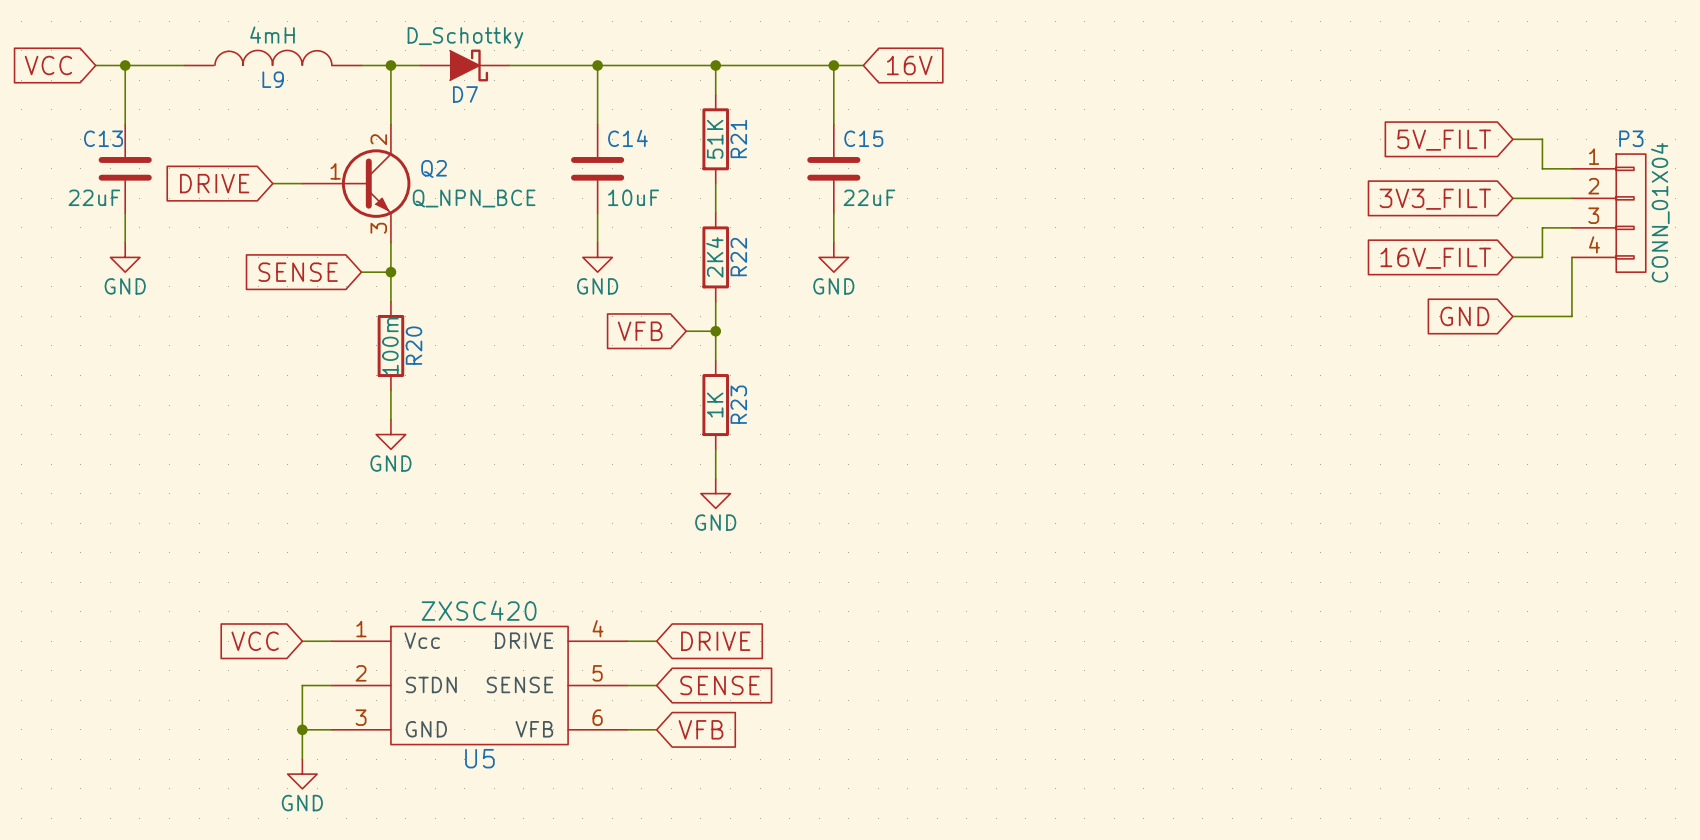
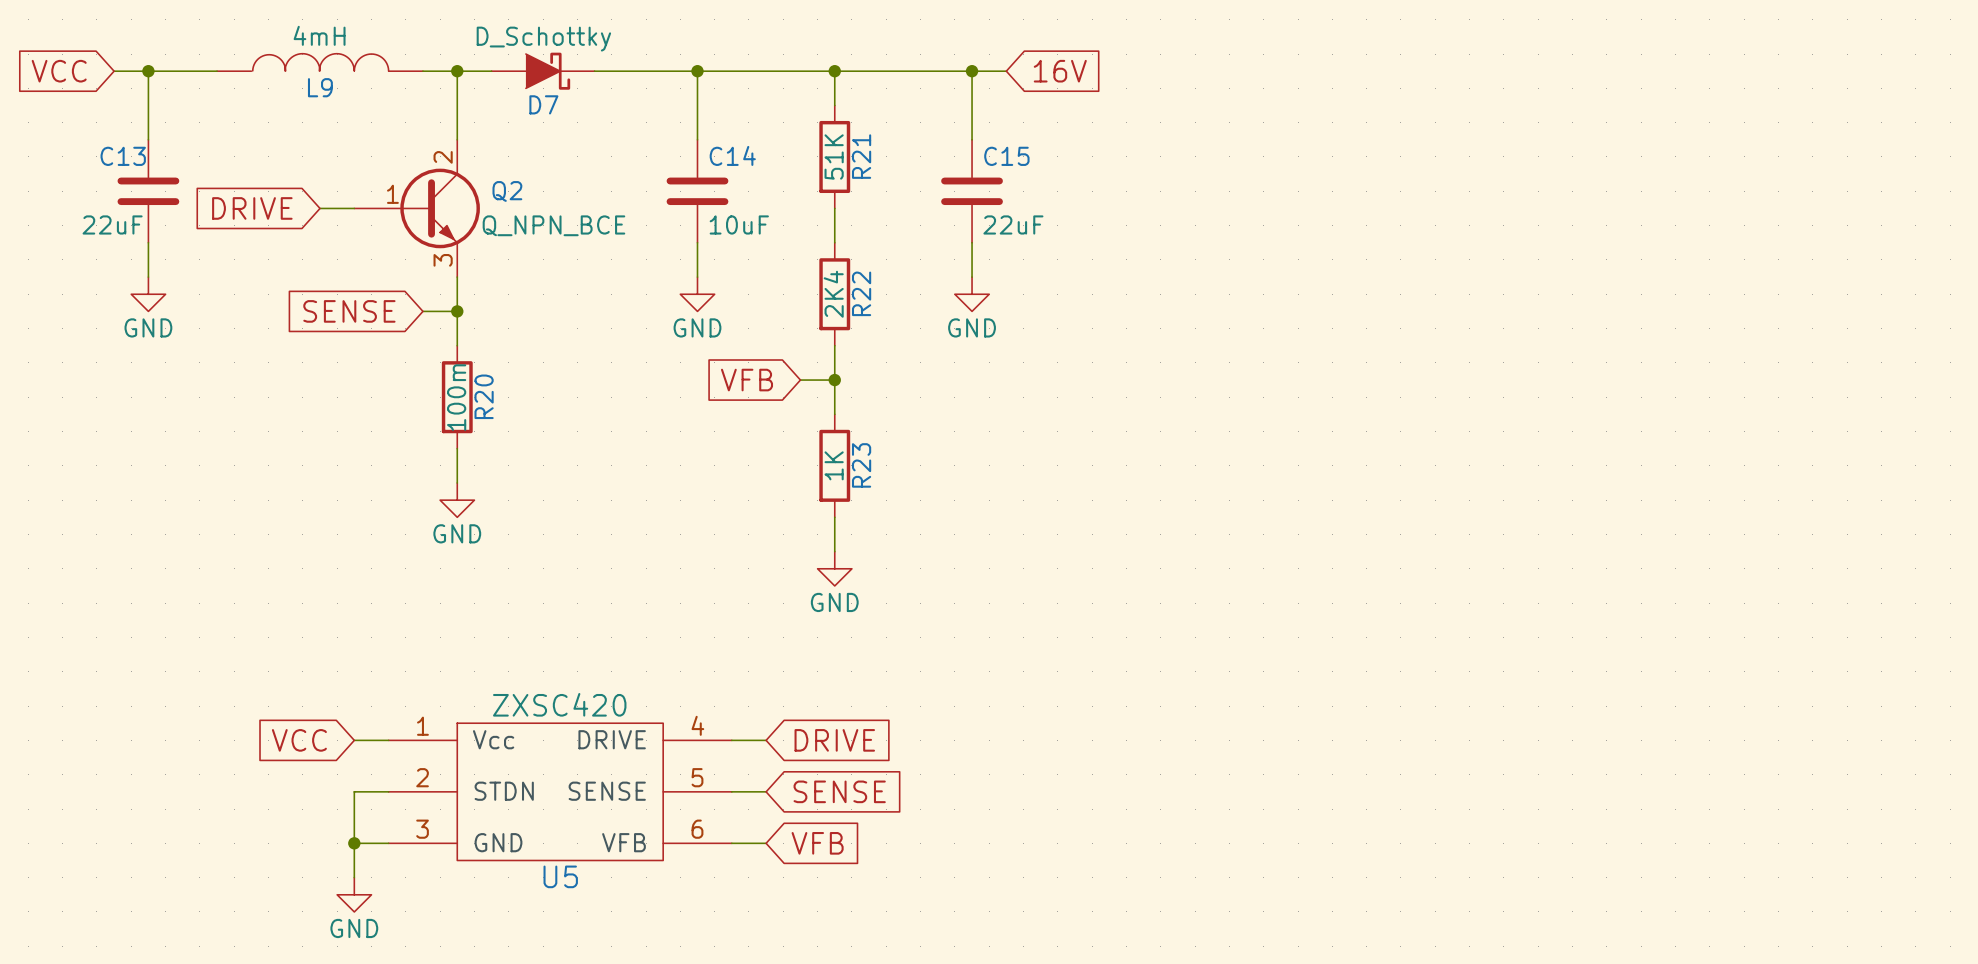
wire: (1512, 139) (1542, 139) (1542, 168) (1571, 168) -> none
global label: 5V_FILT (1444, 140) -> none
wire: (1512, 198) (1571, 198) -> none
global label: 3V3_FILT (1435, 199) -> none
P3: CONN_01X04 (1608, 213) -> none
wire: (1571, 227) (1542, 227) (1542, 257) (1512, 257) -> none
wire: (1571, 257) (1571, 316) (1512, 316) -> none
global label: 16V_FILT (1435, 258) -> none
global label: GND (1464, 316) -> none

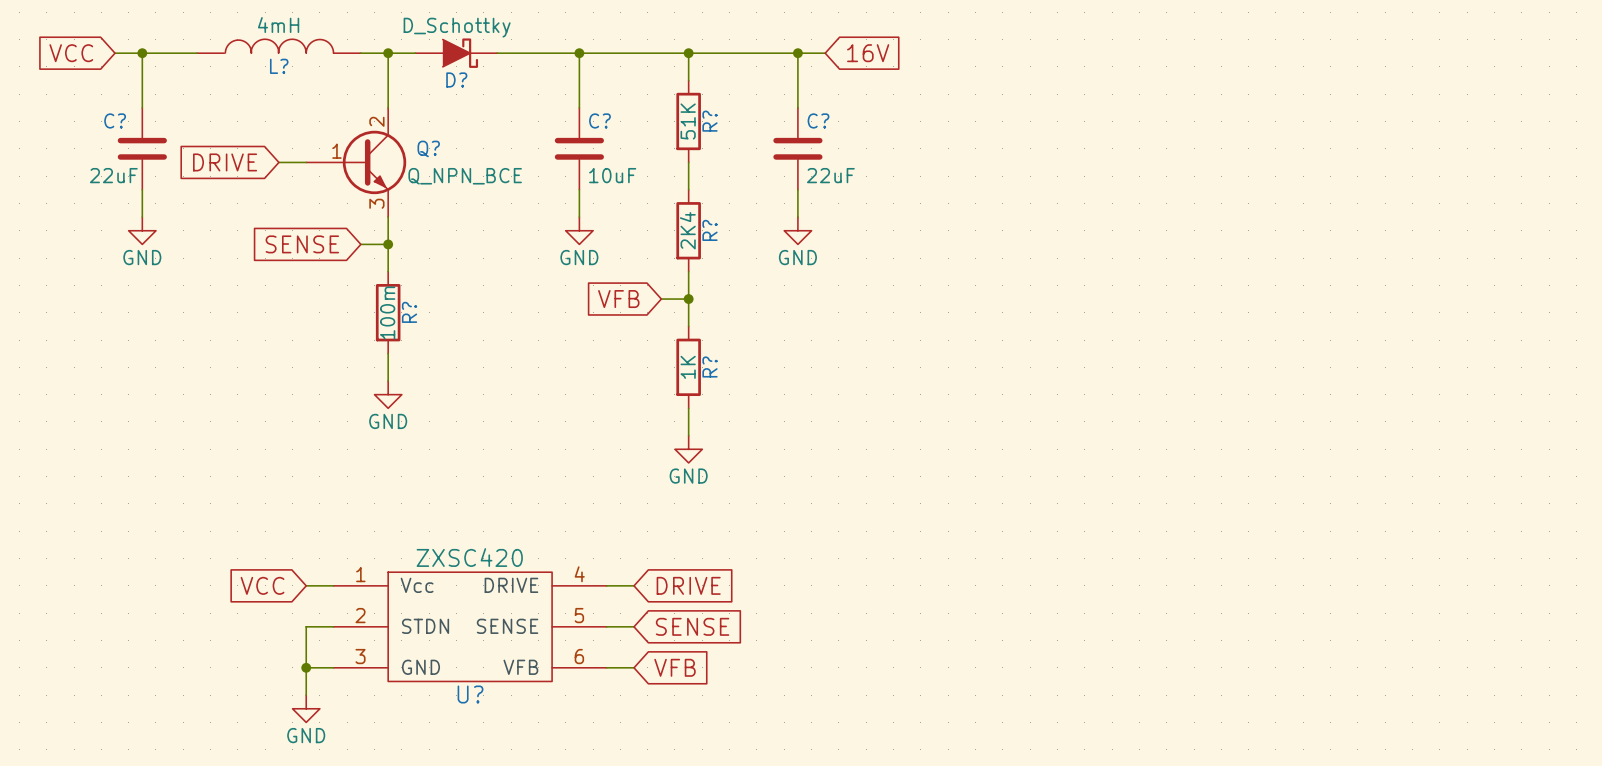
L9 name: L9 (320, 87) -> L? (279, 66)
D7 name: D7 (543, 104) -> D? (456, 79)
C14 name: C14 (732, 155) -> C? (599, 120)
C13 name: C13 (123, 156) -> C? (115, 120)
R21 name: R21 (861, 156) -> R? (709, 121)
C15 name: C15 (1006, 156) -> C? (818, 120)
Q2 name: Q2 (507, 191) -> Q? (428, 148)
R22 name: R22 (861, 293) -> R? (709, 230)
R20 name: R20 (484, 396) -> R? (409, 312)
R23 name: R23 (861, 465) -> R? (709, 367)
U5 name: U5 (560, 876) -> U? (470, 694)

